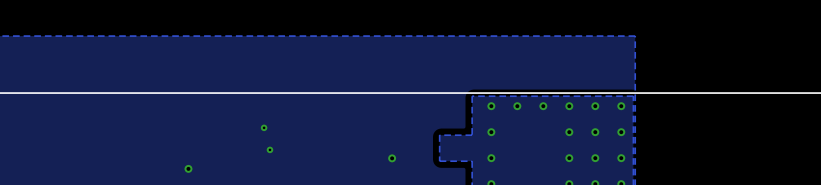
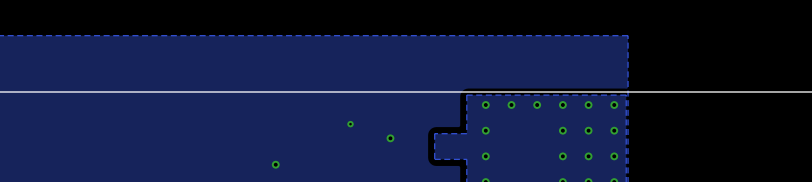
via: none -> (350, 124)
via: (264, 127) -> none
via: none -> (390, 138)
via: (269, 149) -> none
via: (392, 158) -> none
via: none -> (275, 164)
via: (188, 168) -> none

